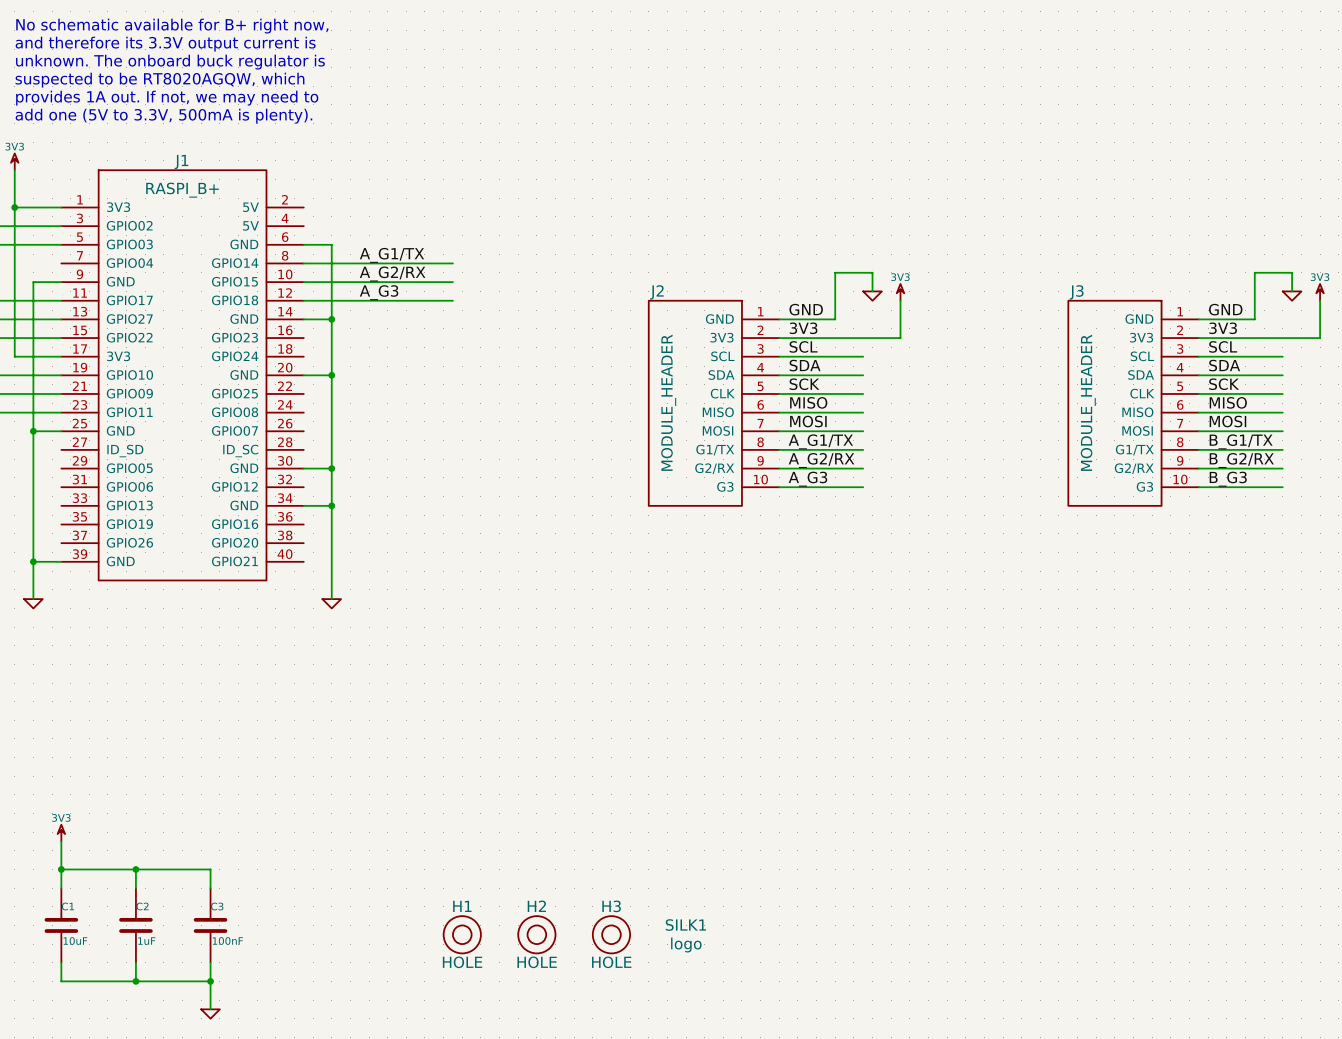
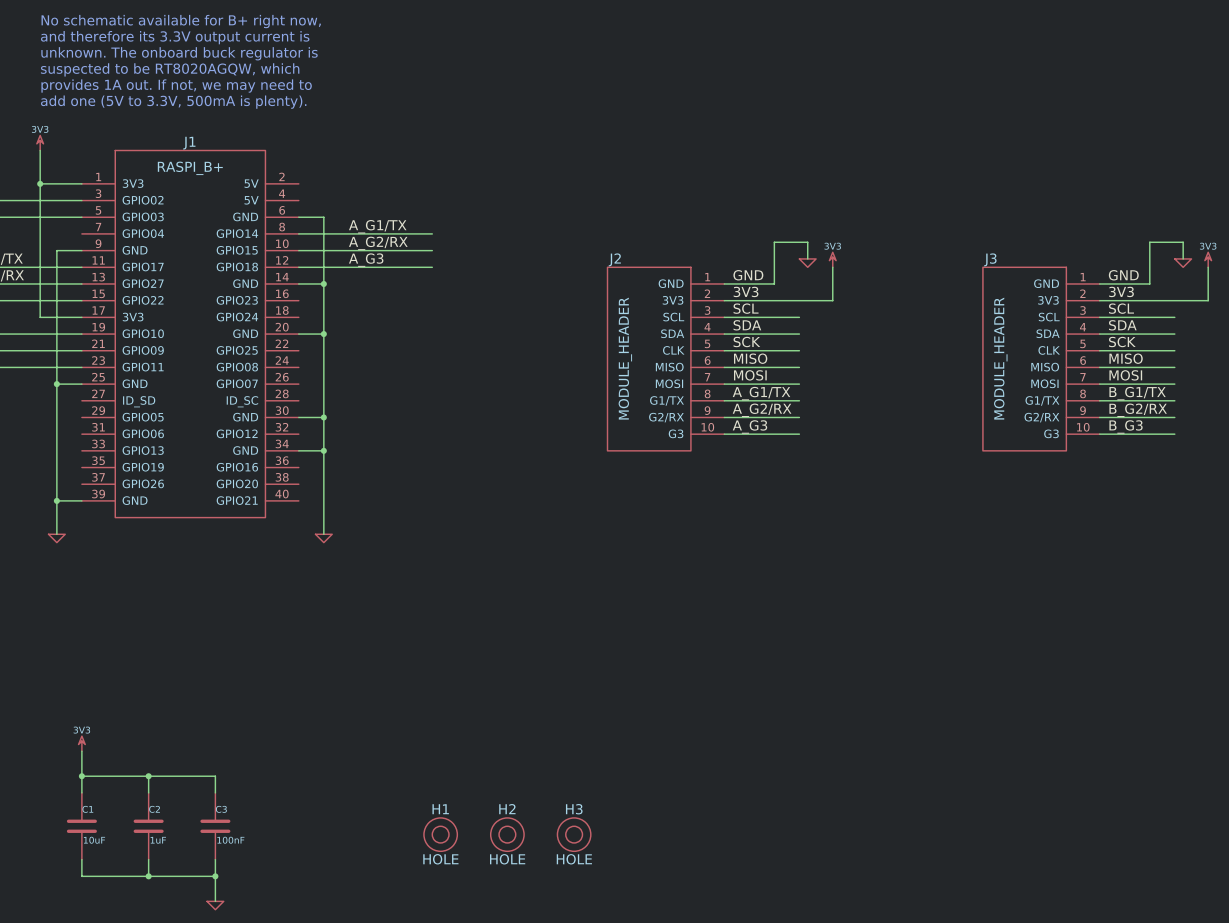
SILK1: logo (685, 935) -> none

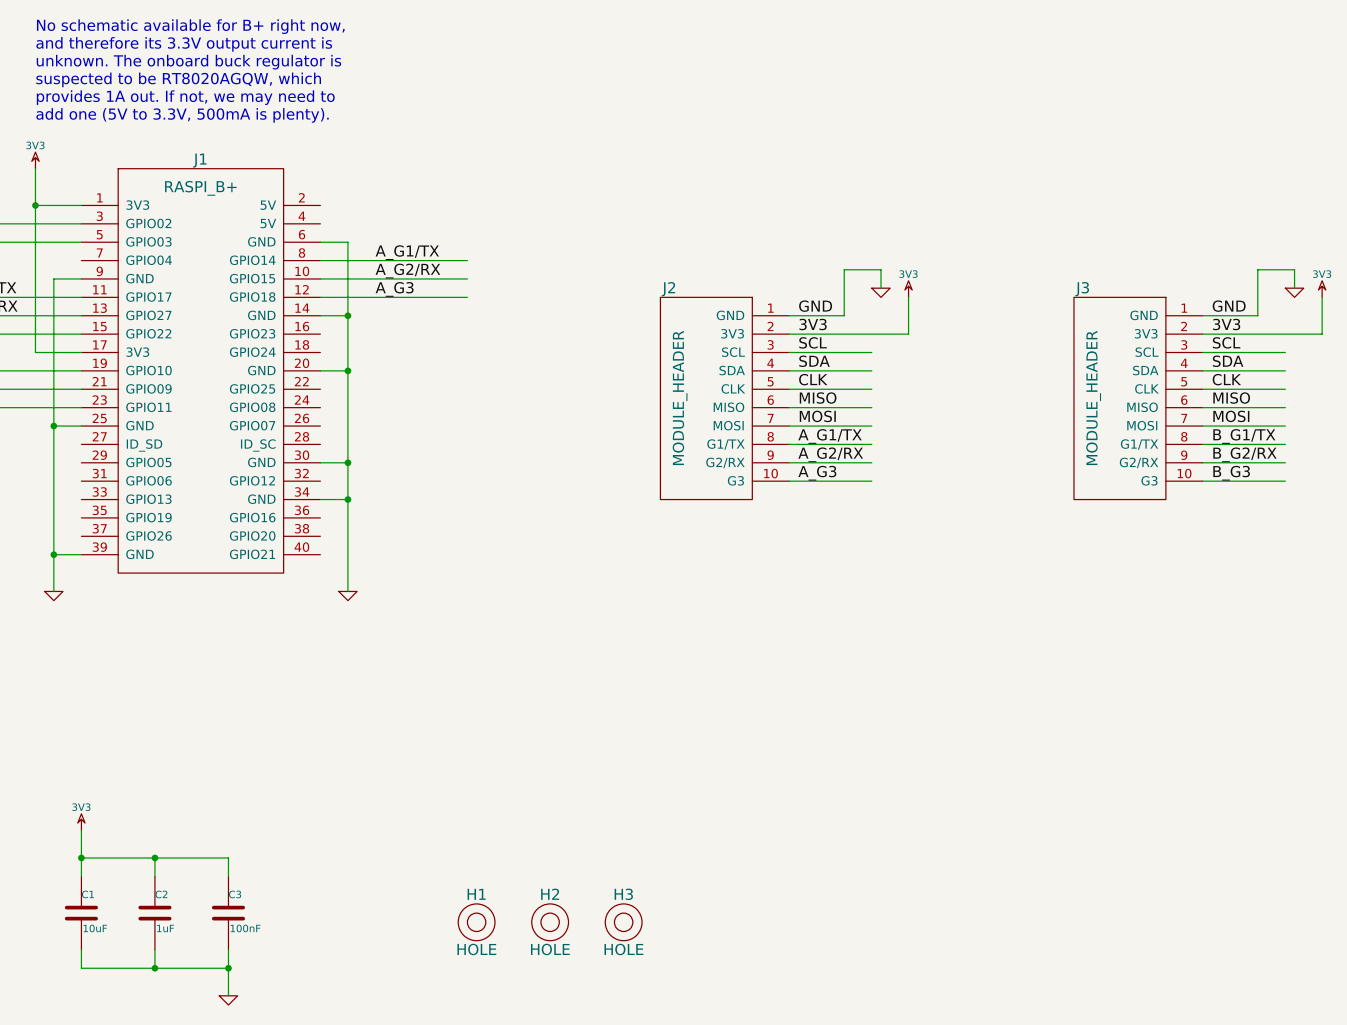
label: SCK (746, 342) -> CLK (813, 379)
label: SCK (1122, 342) -> CLK (1226, 379)

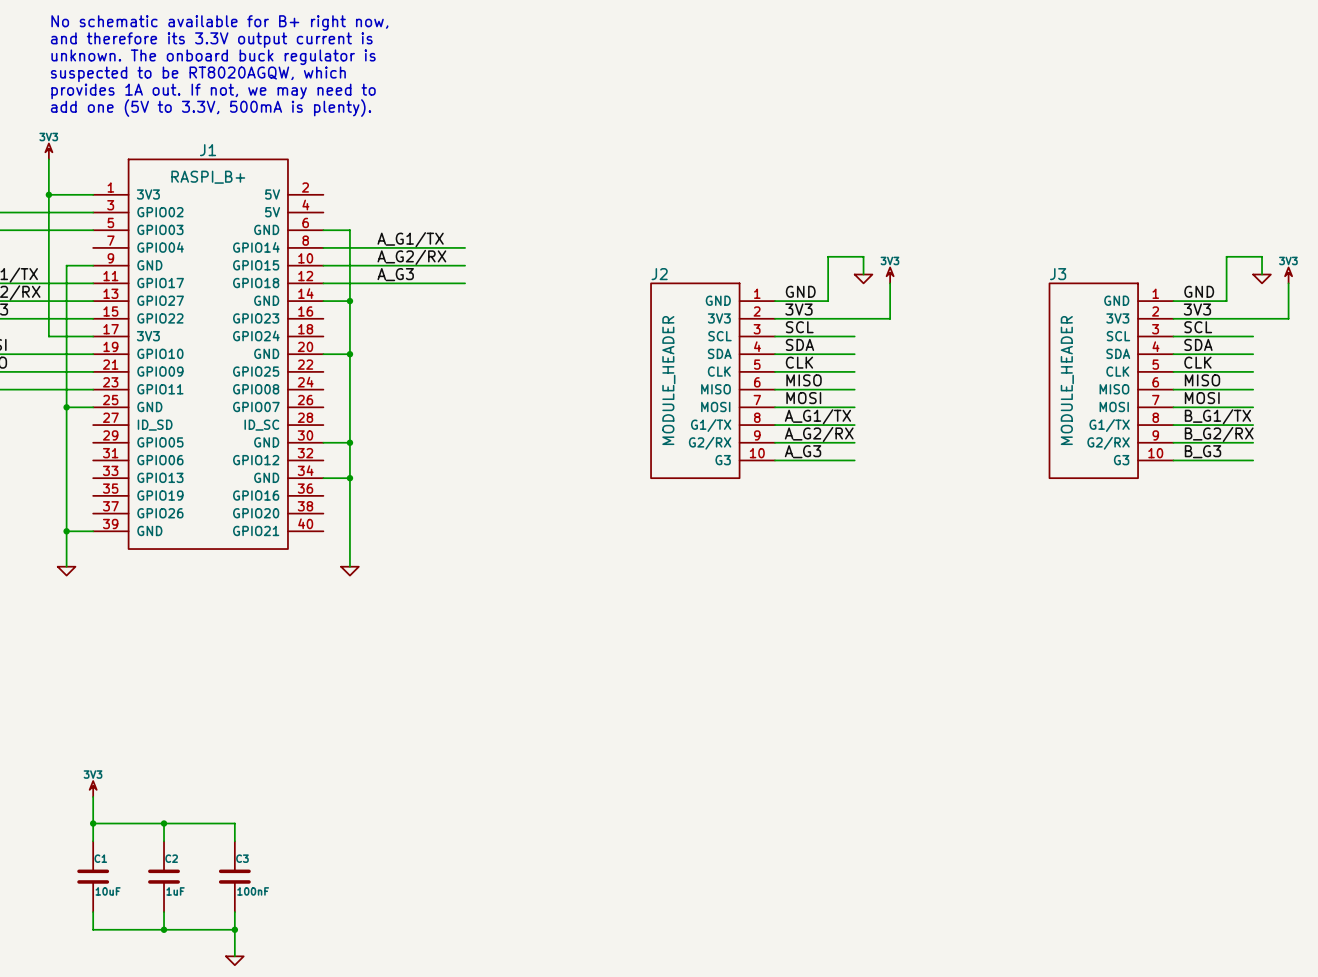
H1: HOLE (476, 922) -> none
H2: HOLE (550, 922) -> none
H3: HOLE (623, 922) -> none

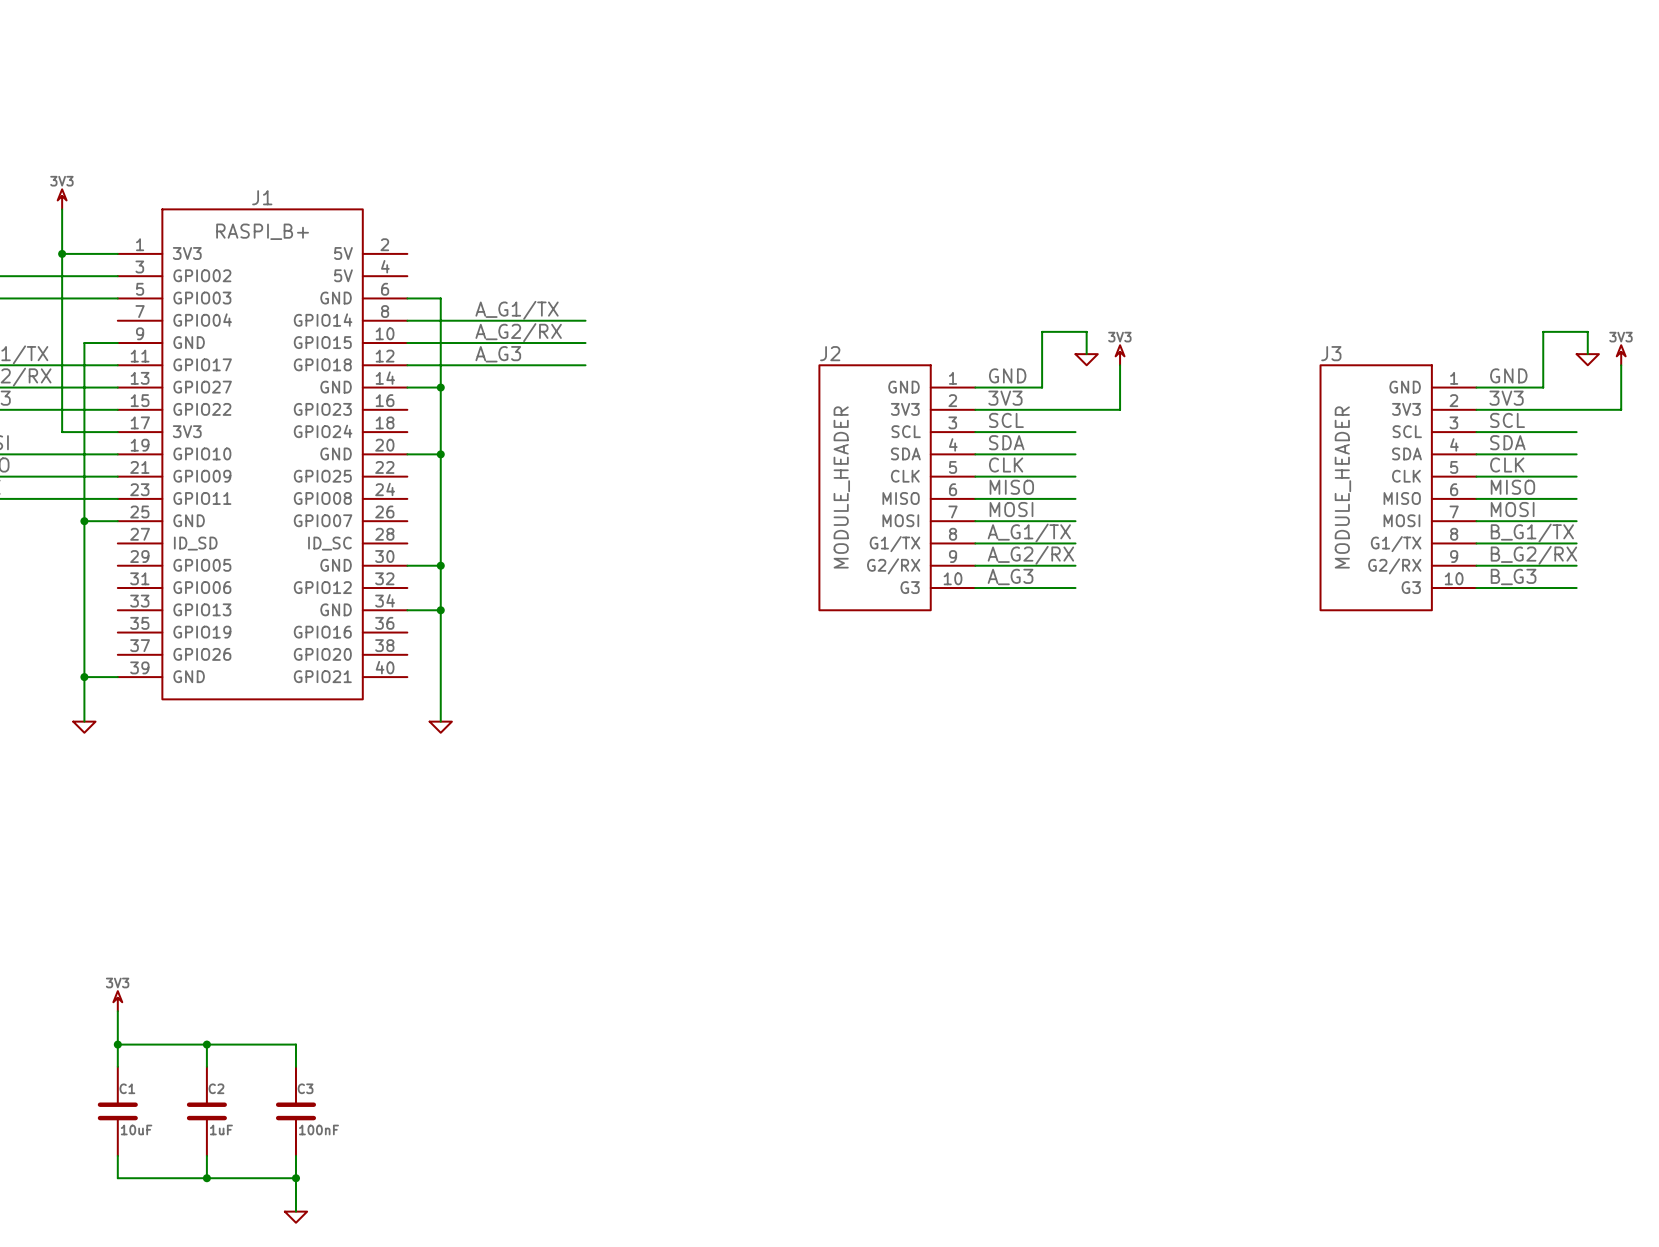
text: No schematic available for B+ right now, (219, 23) -> none
text: and therefore its 3.3V output current is (211, 40) -> none
text: unknown. The onboard buck regulator is (213, 57) -> none
text: suspected to be RT8020AGQW, which (198, 74) -> none
text: provides 1A out. If not, we may need to (213, 91) -> none
text: add one (5V to 3.3V, 500mA is plenty). (211, 108) -> none

